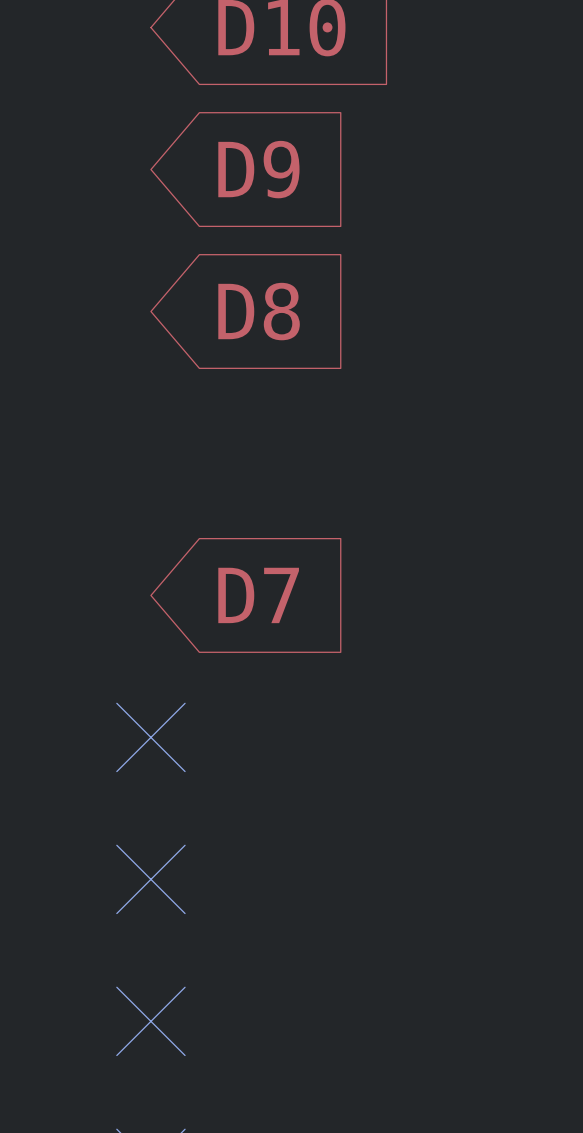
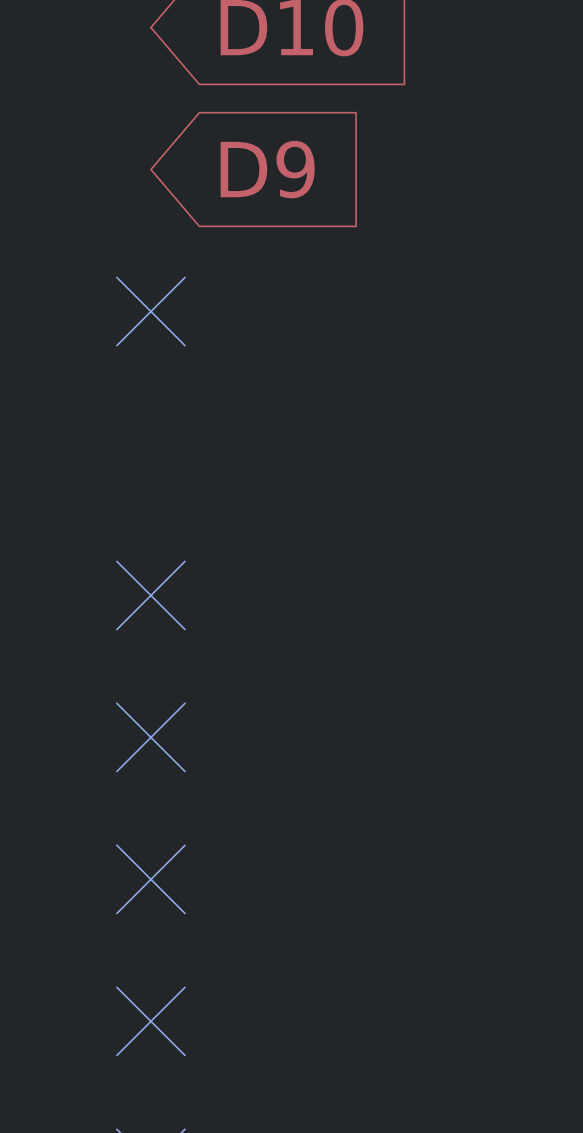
no-connect mark: none -> (150, 311)
global label: D8 (259, 311) -> none
no-connect mark: none -> (150, 595)
global label: D7 (258, 595) -> none

